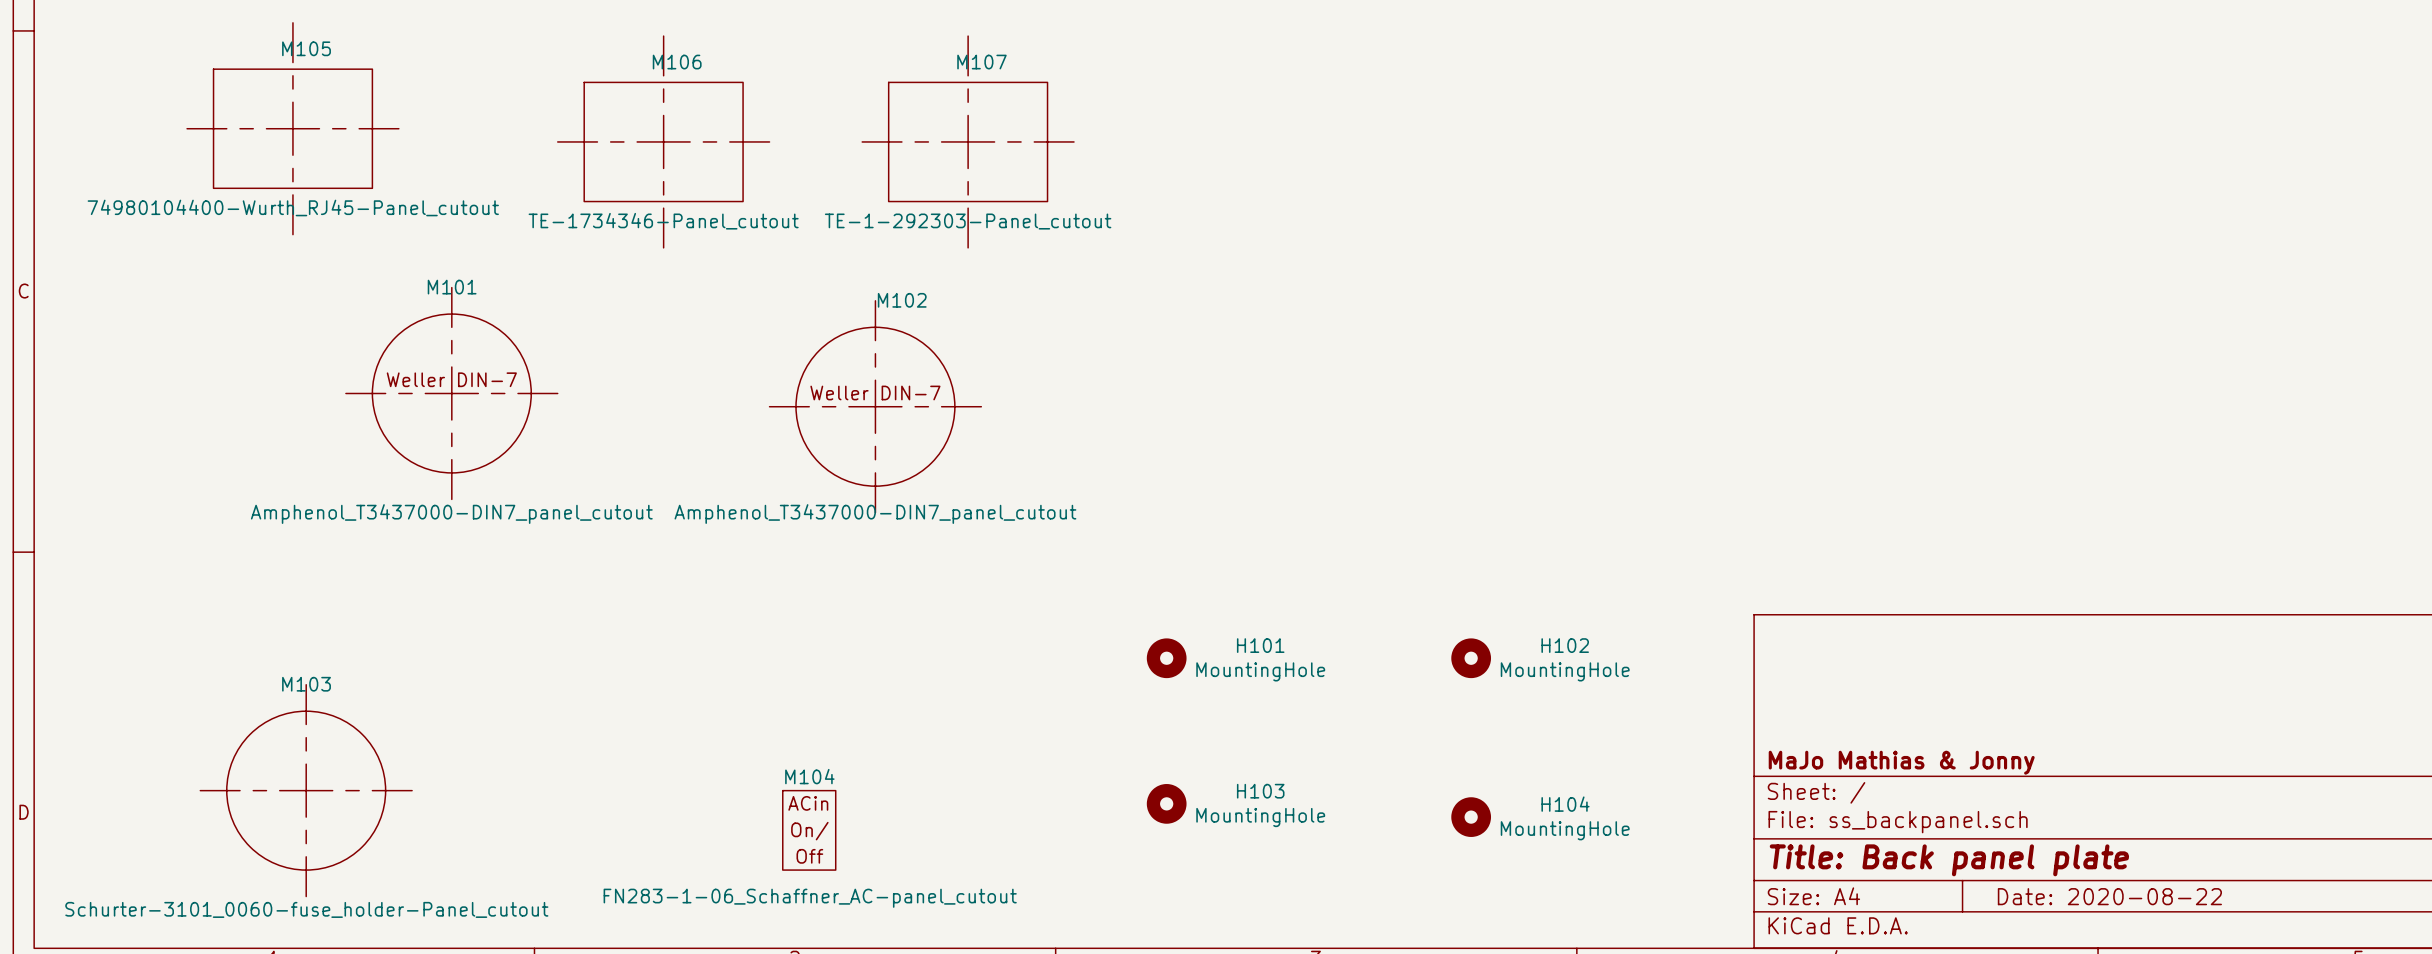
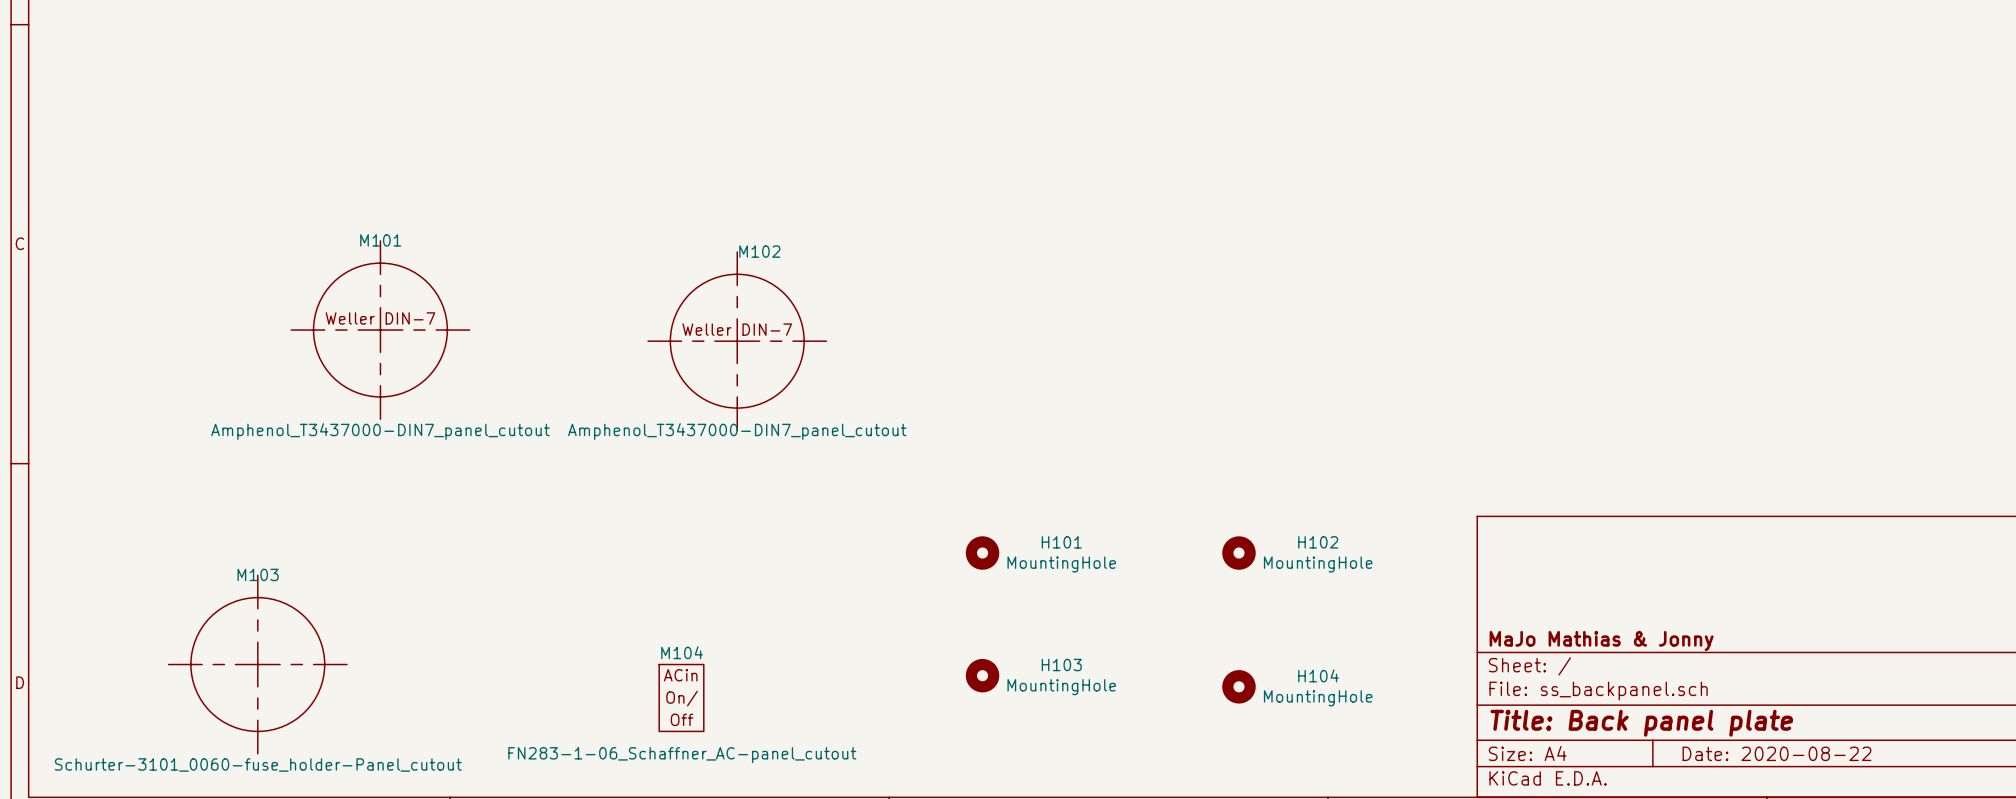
M105: 74980104400-Wurth_RJ45-Panel_cutout (292, 128) -> none
M106: TE-1734346-Panel_cutout (663, 141) -> none
M107: TE-1-292303-Panel_cutout (968, 141) -> none

